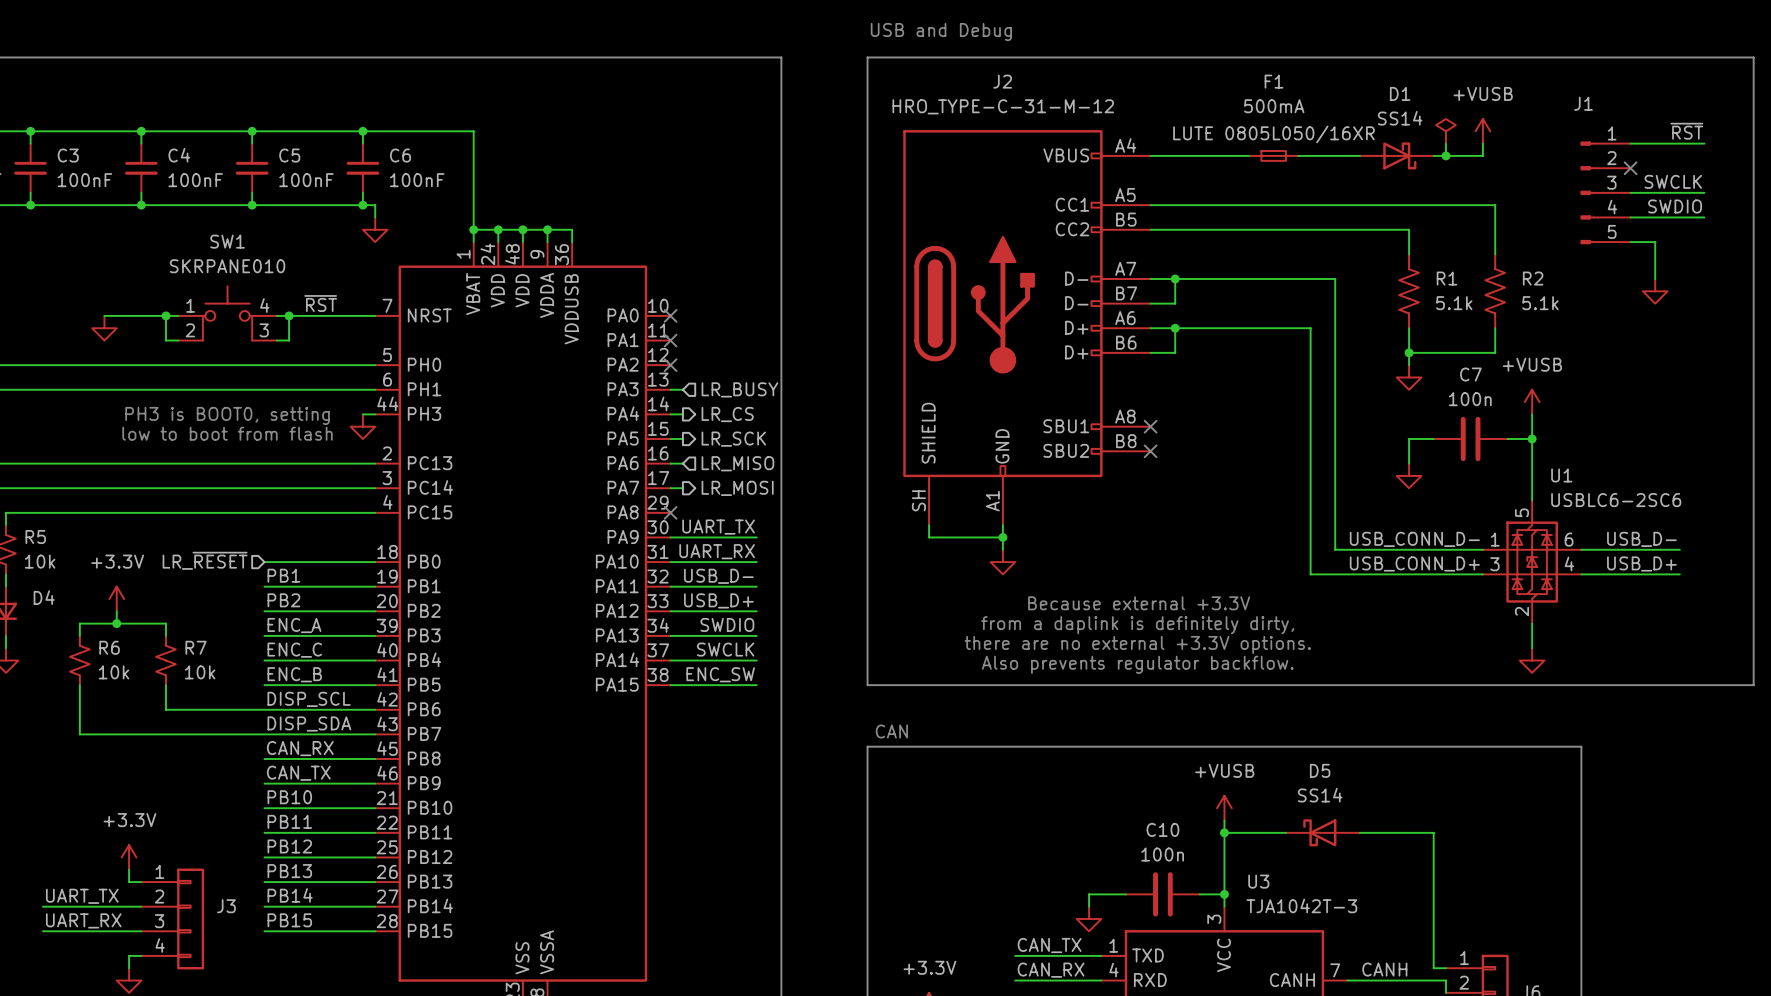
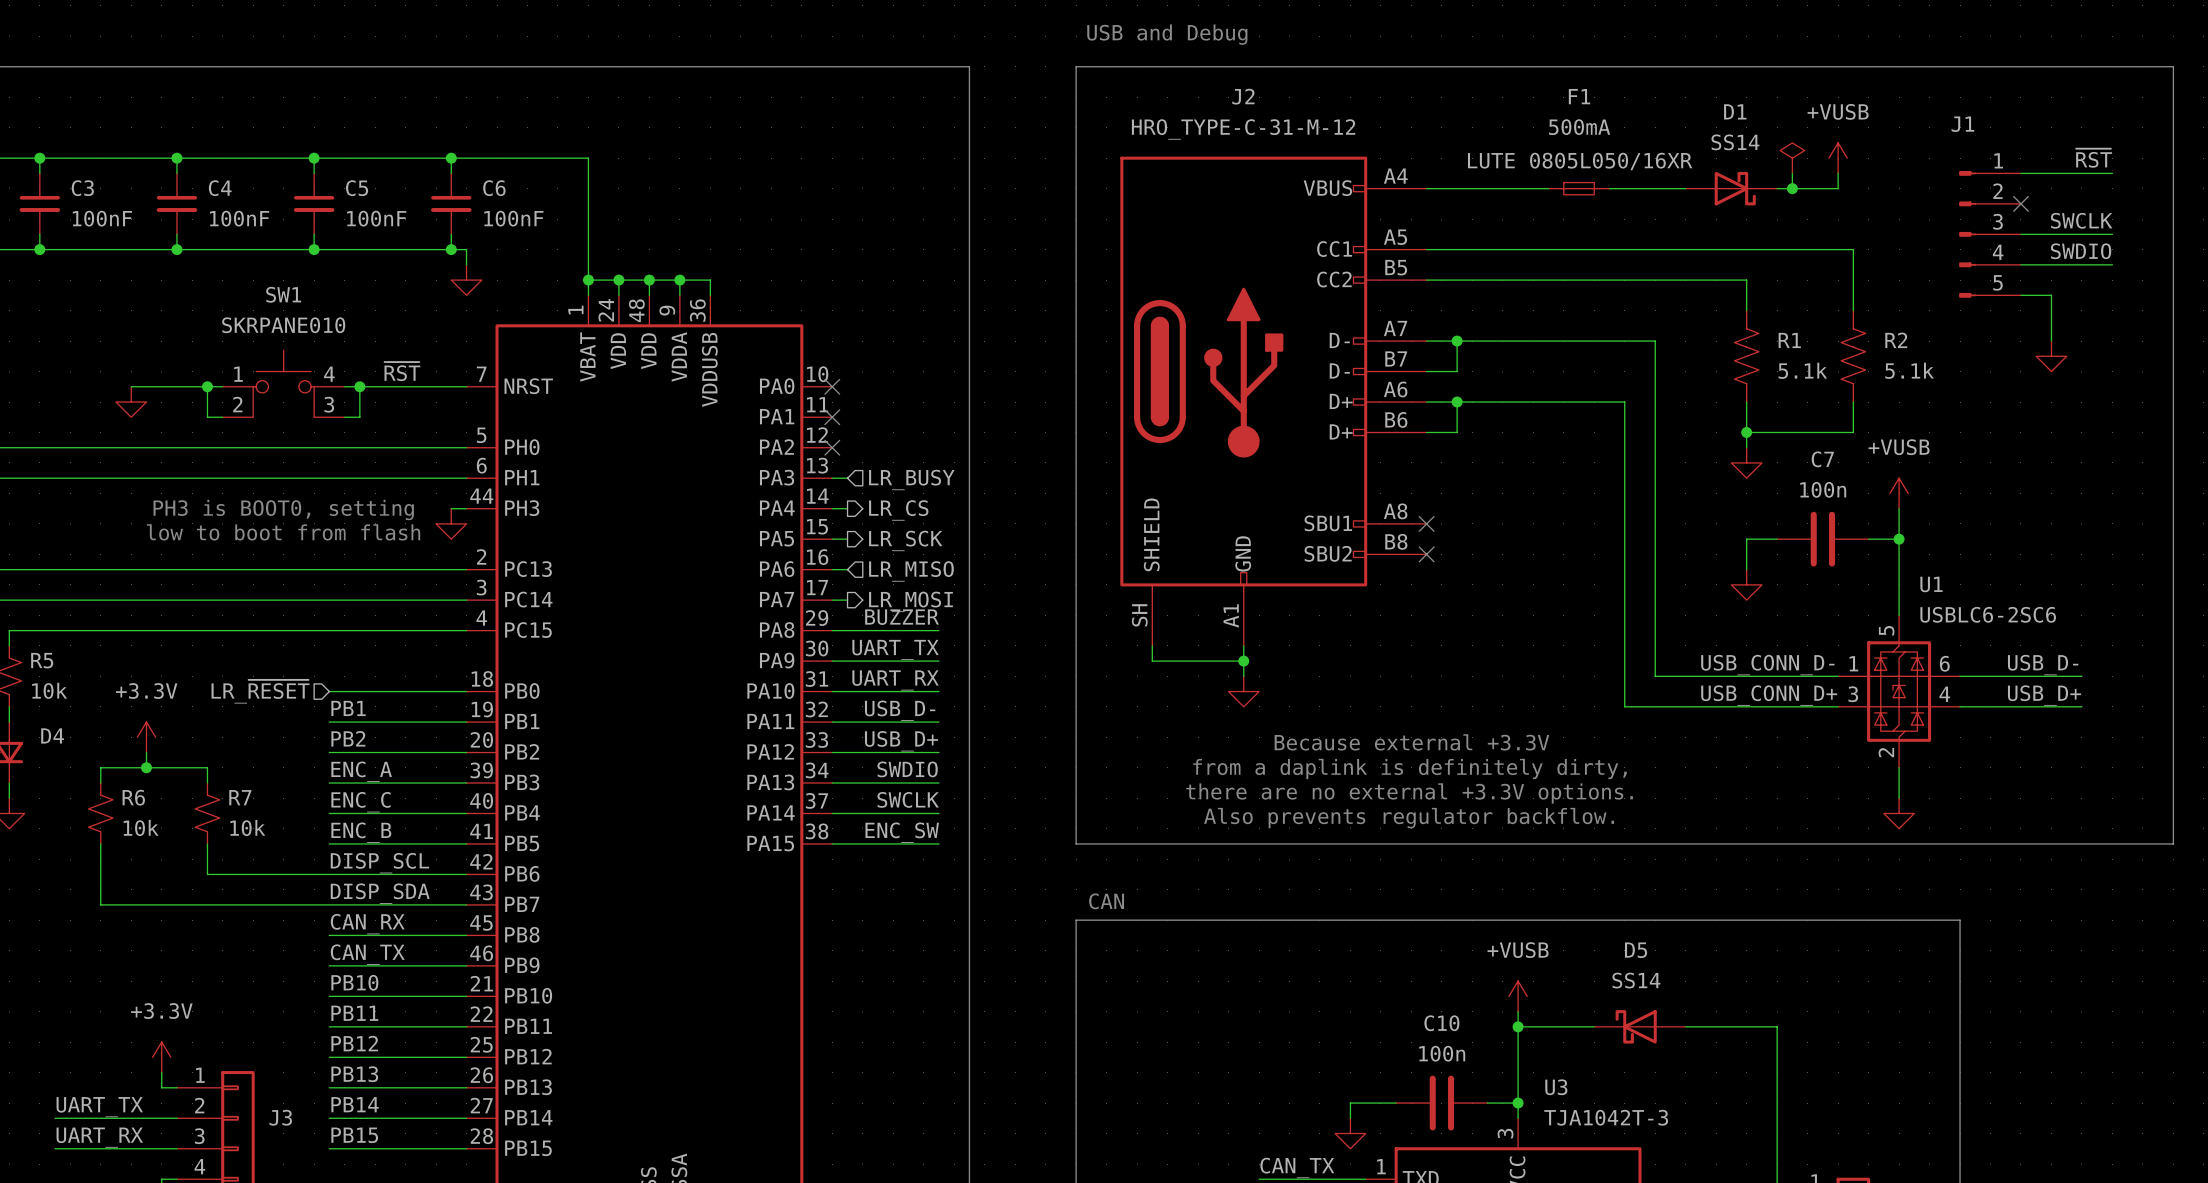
label: none -> BUZZER (902, 617)
wire: none -> (832, 630) (938, 630)
no-connect mark: (670, 512) -> none

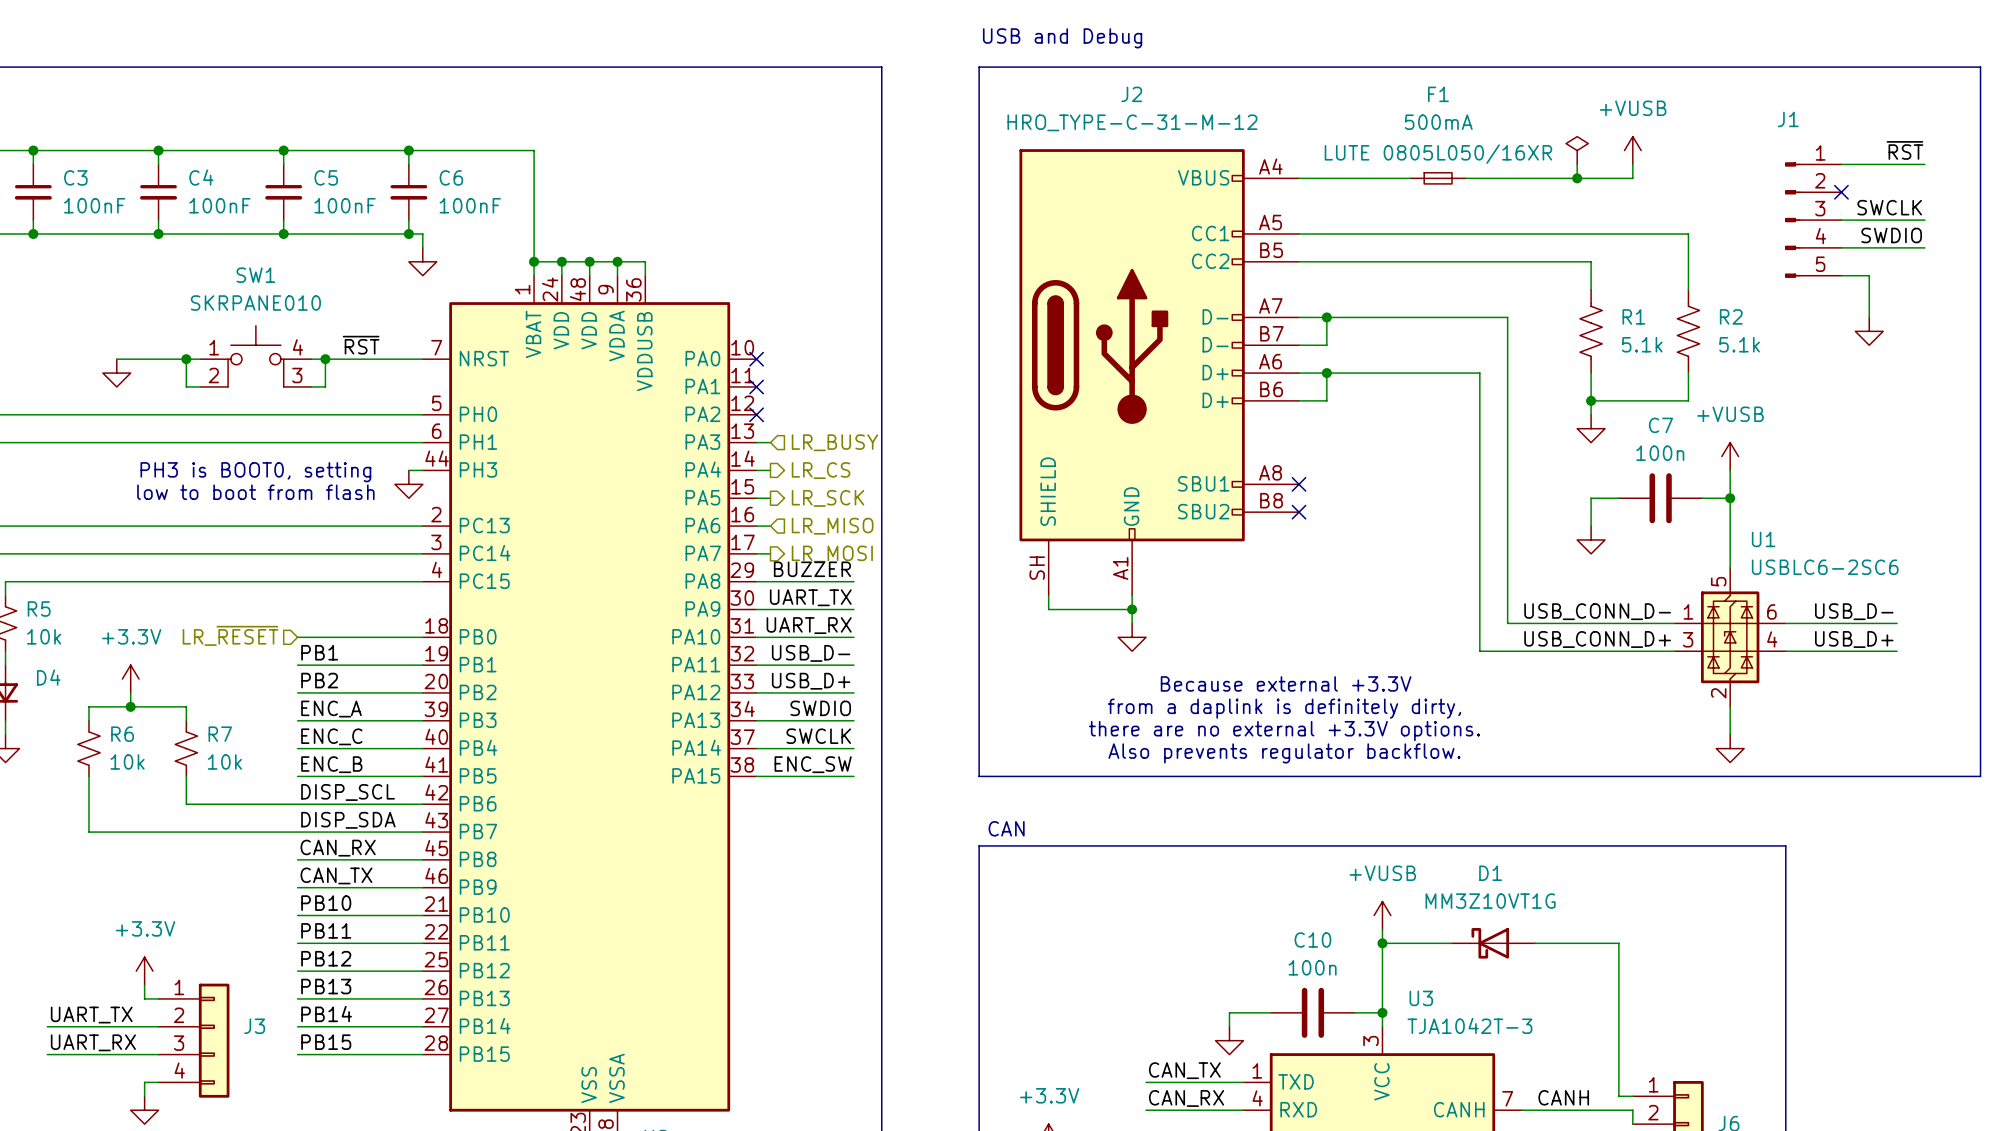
power symbol text: none -> +VUSB (1633, 108)
power symbol shape: [1780, 142, 1805, 174] -> [1624, 136, 1642, 165]
power symbol: none -> (1577, 150)
power symbol: +VUSB (1838, 158) -> none
wire: none -> (1577, 164) (1577, 178)
wire: (1838, 173) (1838, 188) (1792, 188) -> none
D1: SS14 (1731, 188) -> none
junction position: (1792, 188) -> (1577, 178)
D5 name: D5 (1636, 950) -> D1 (1490, 873)
D5 value: SS14 (1636, 980) -> MM3Z10VT1G (1490, 901)

